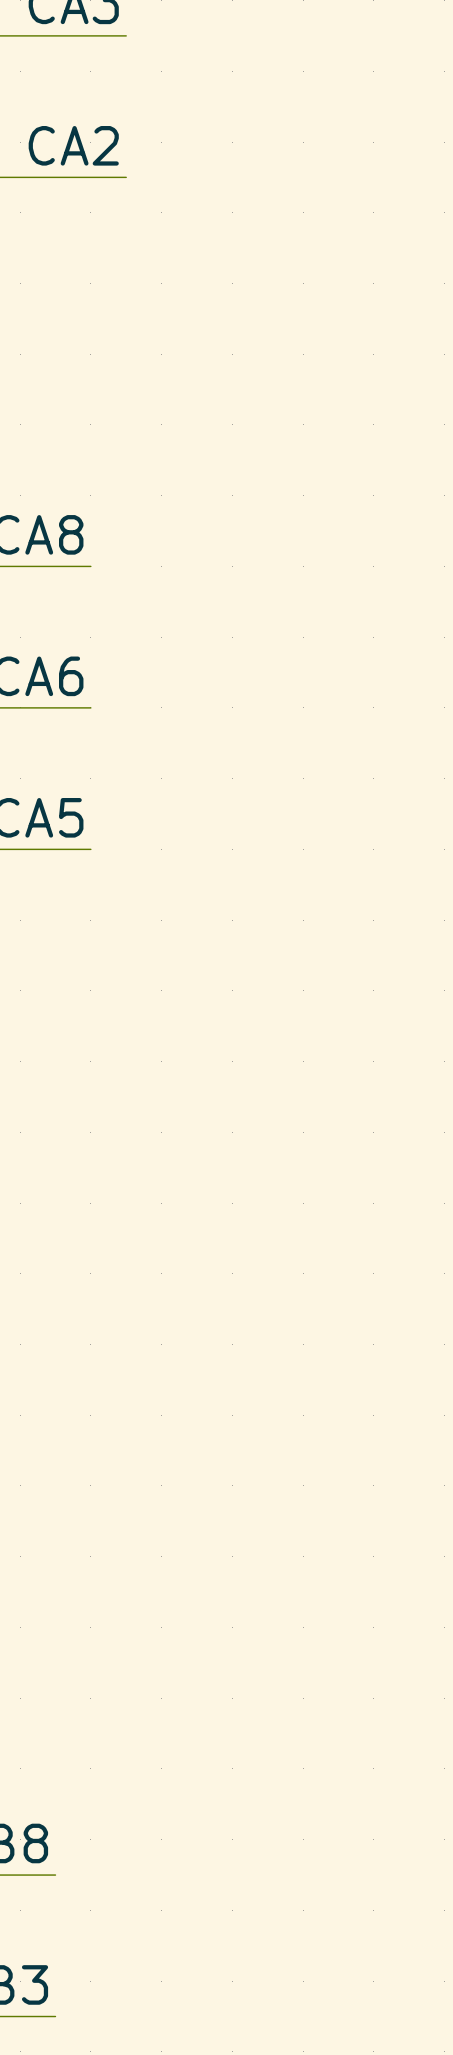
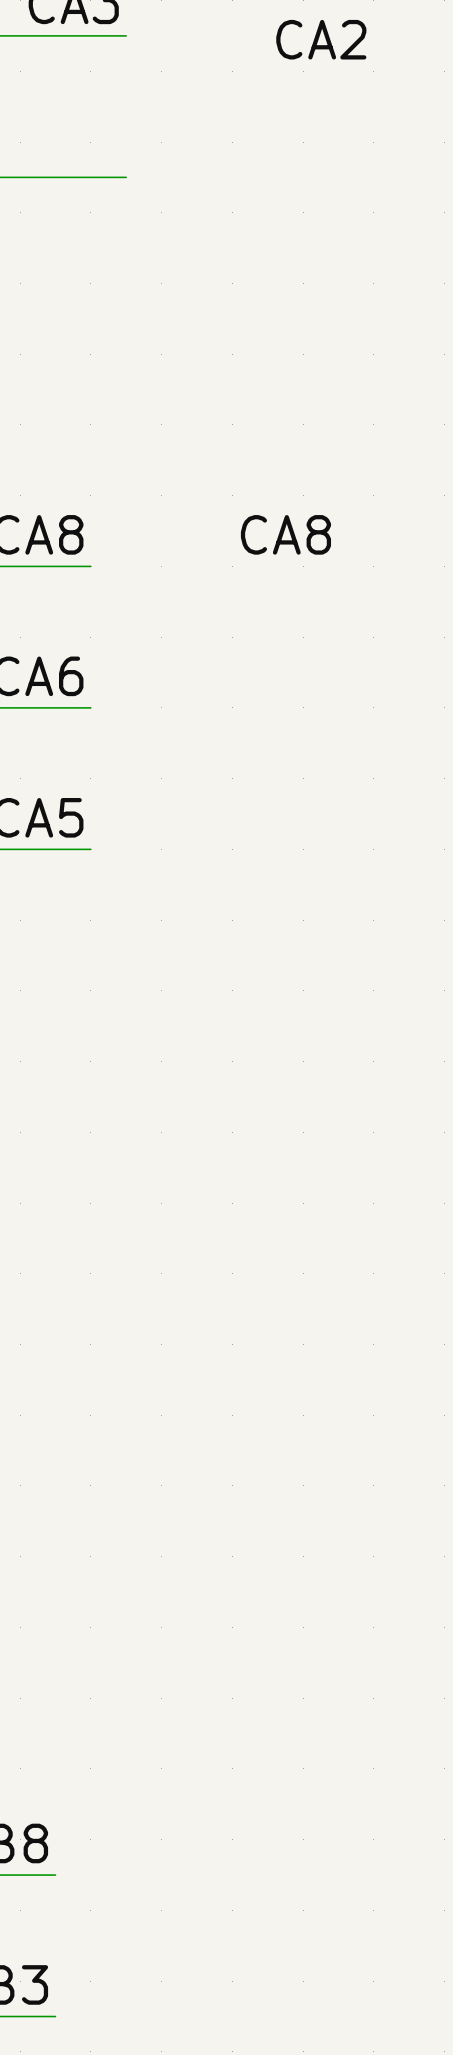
label position: CA2 (73, 145) -> CA2 (321, 39)
label: none -> CA8 (285, 534)

